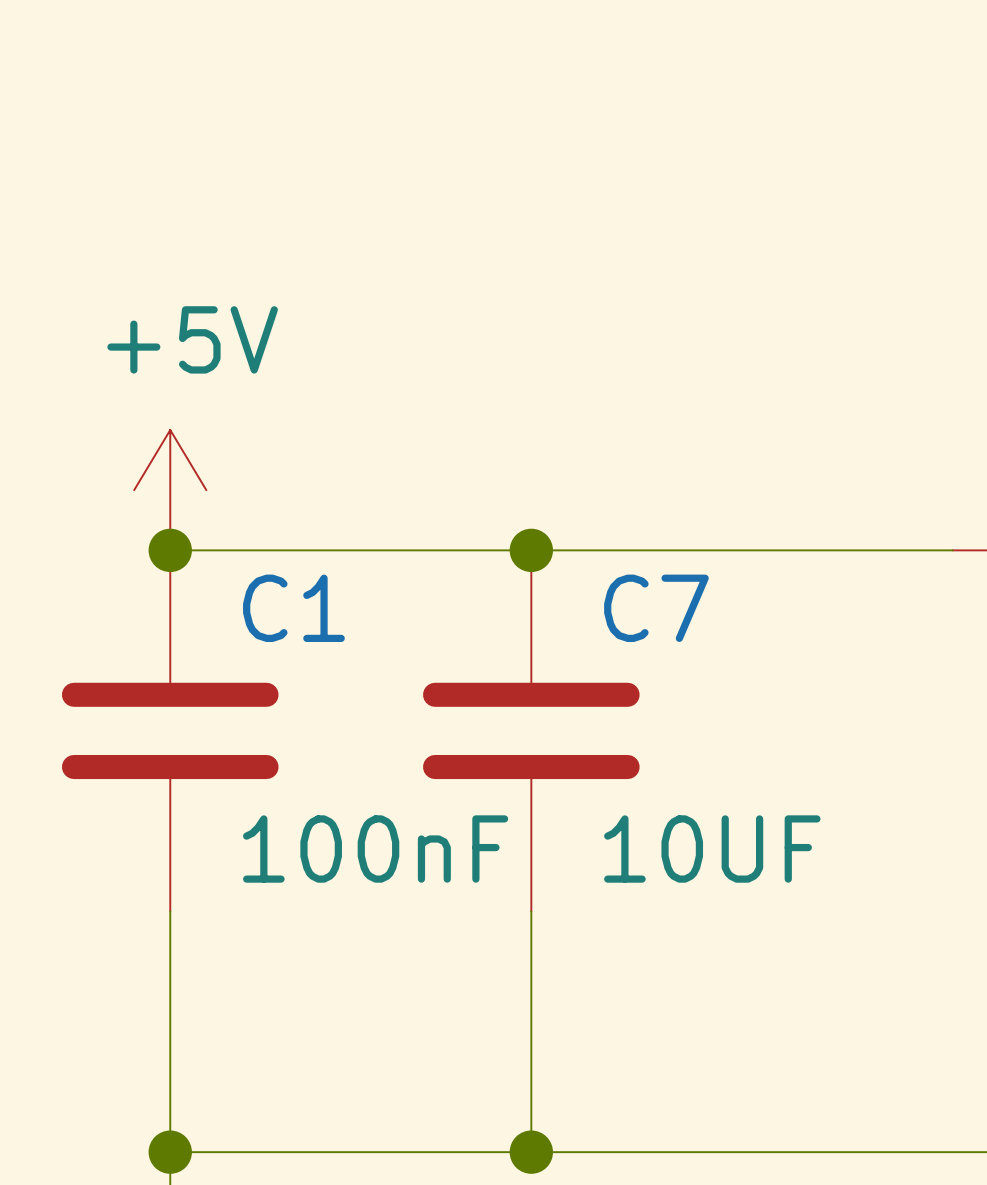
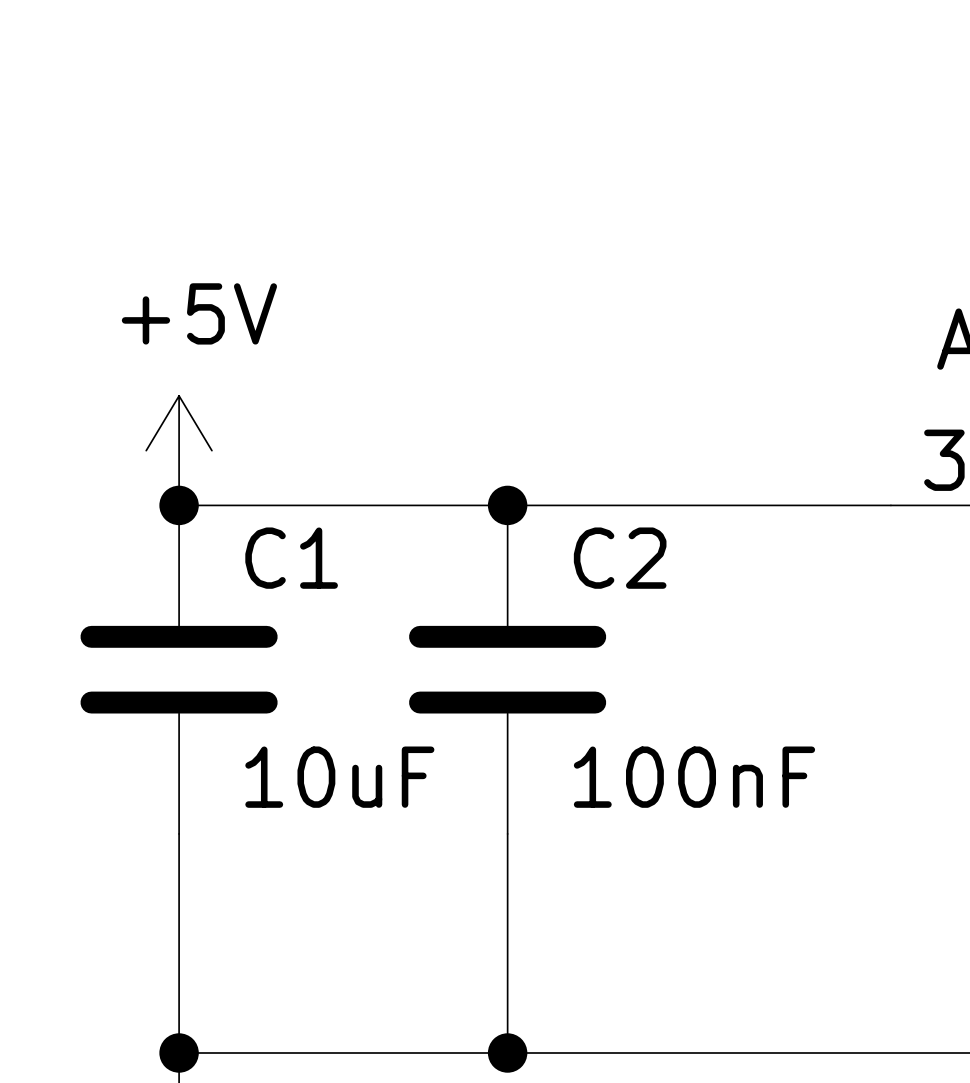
C7 name: C7 (656, 608) -> C2 (620, 558)
C1 value: 100nF (375, 849) -> 10uF (339, 777)
C7 value: 10UF (712, 849) -> 100nF (694, 777)

